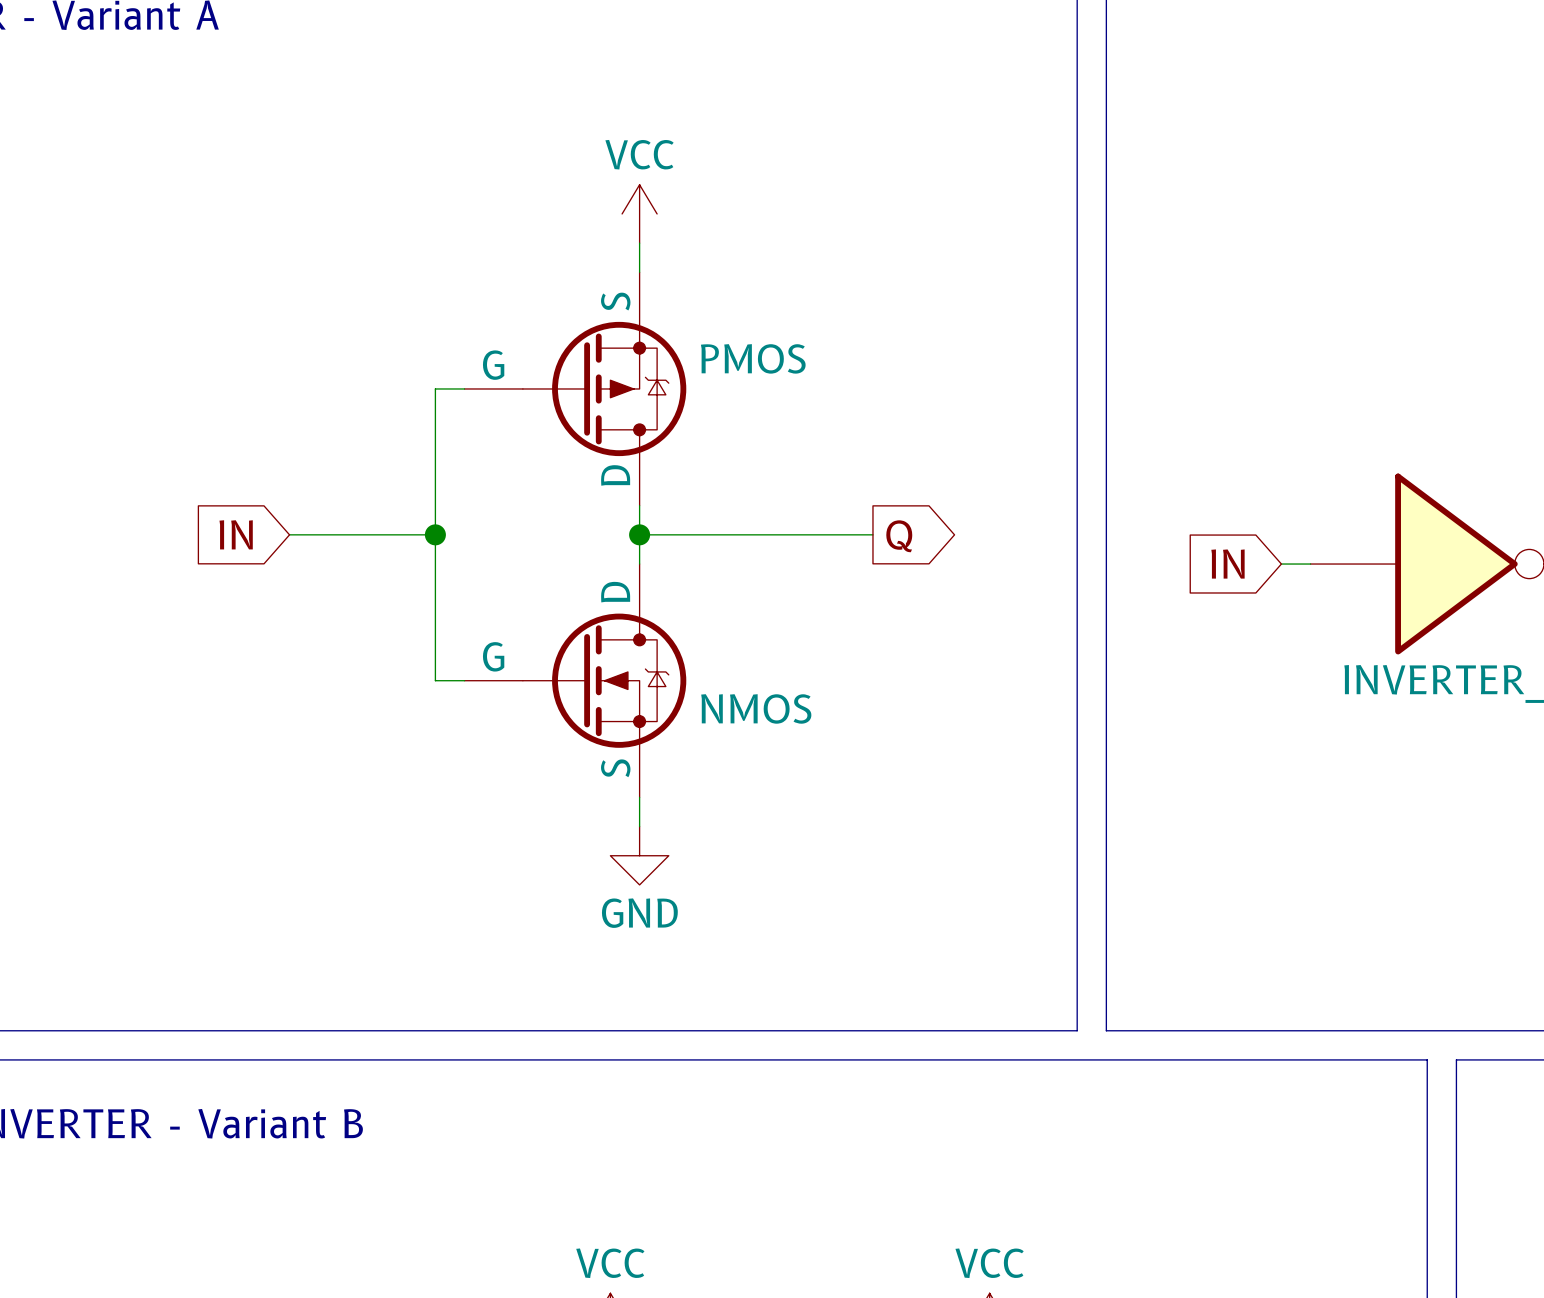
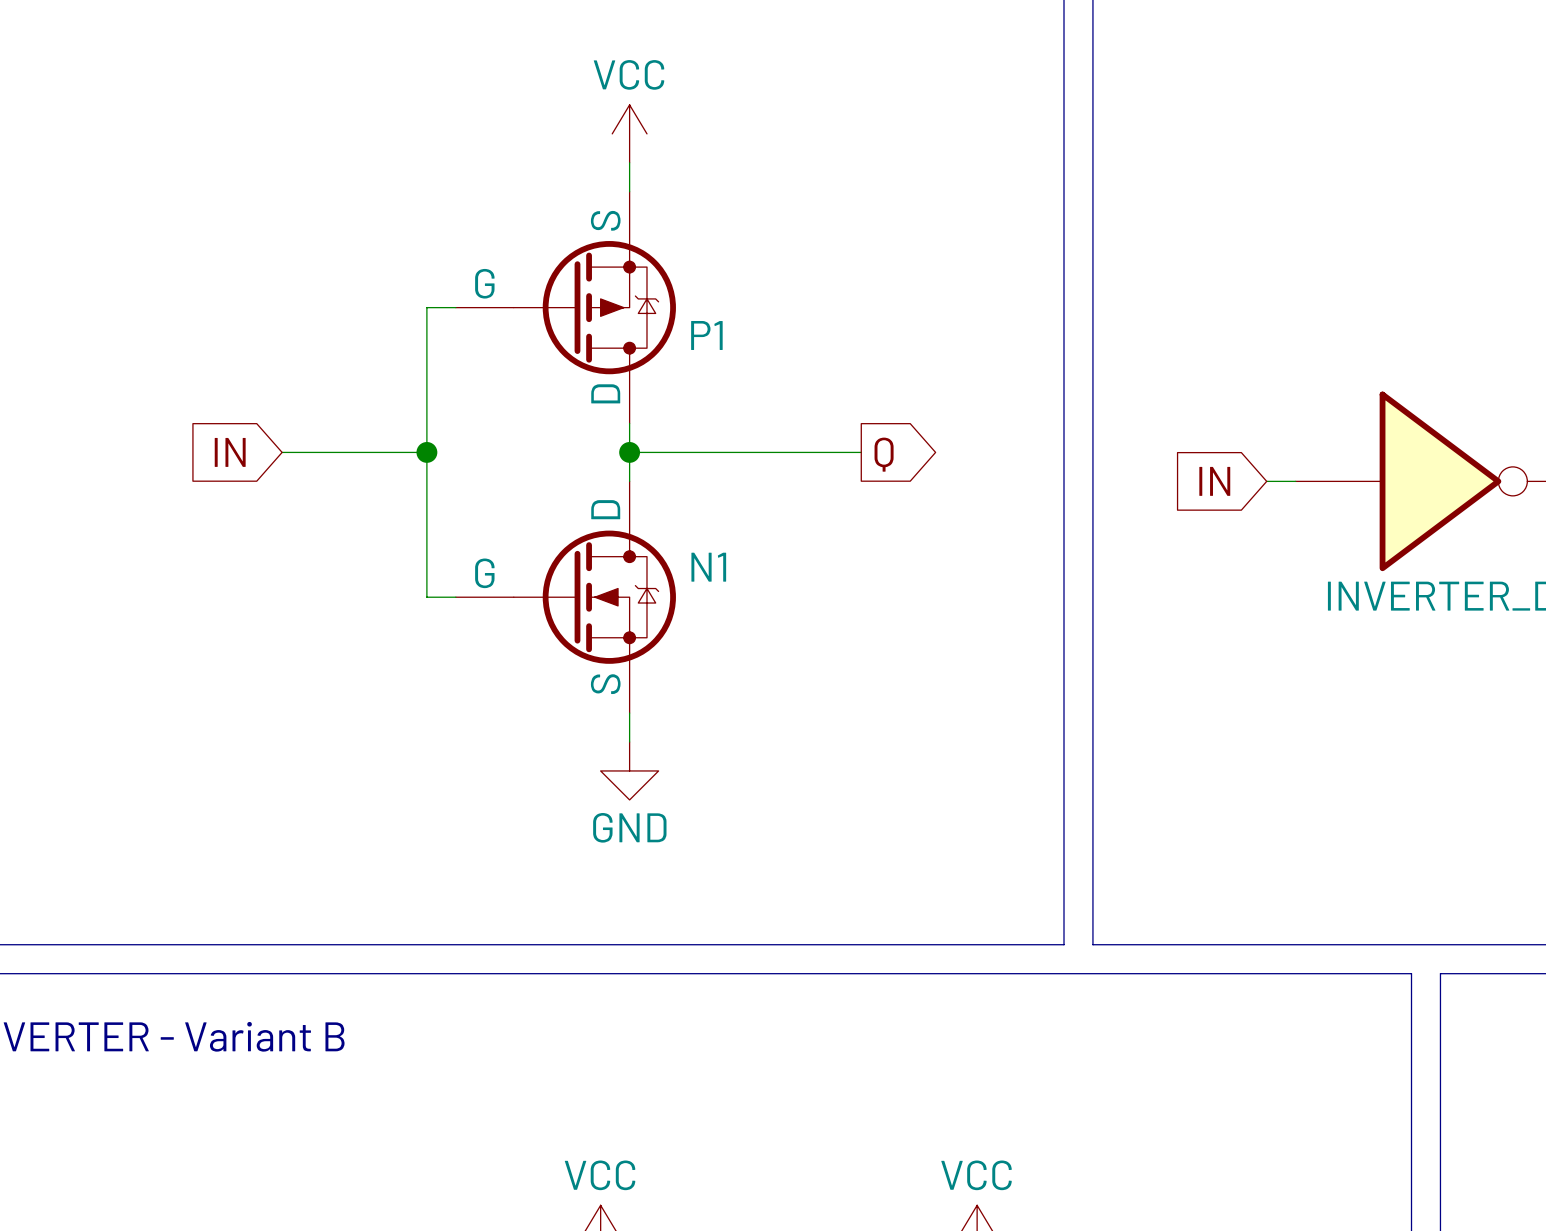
P1 value: PMOS (753, 358) -> none
P1 name: none -> P1 (706, 335)
N1 name: none -> N1 (708, 567)
N1 value: NMOS (756, 708) -> none

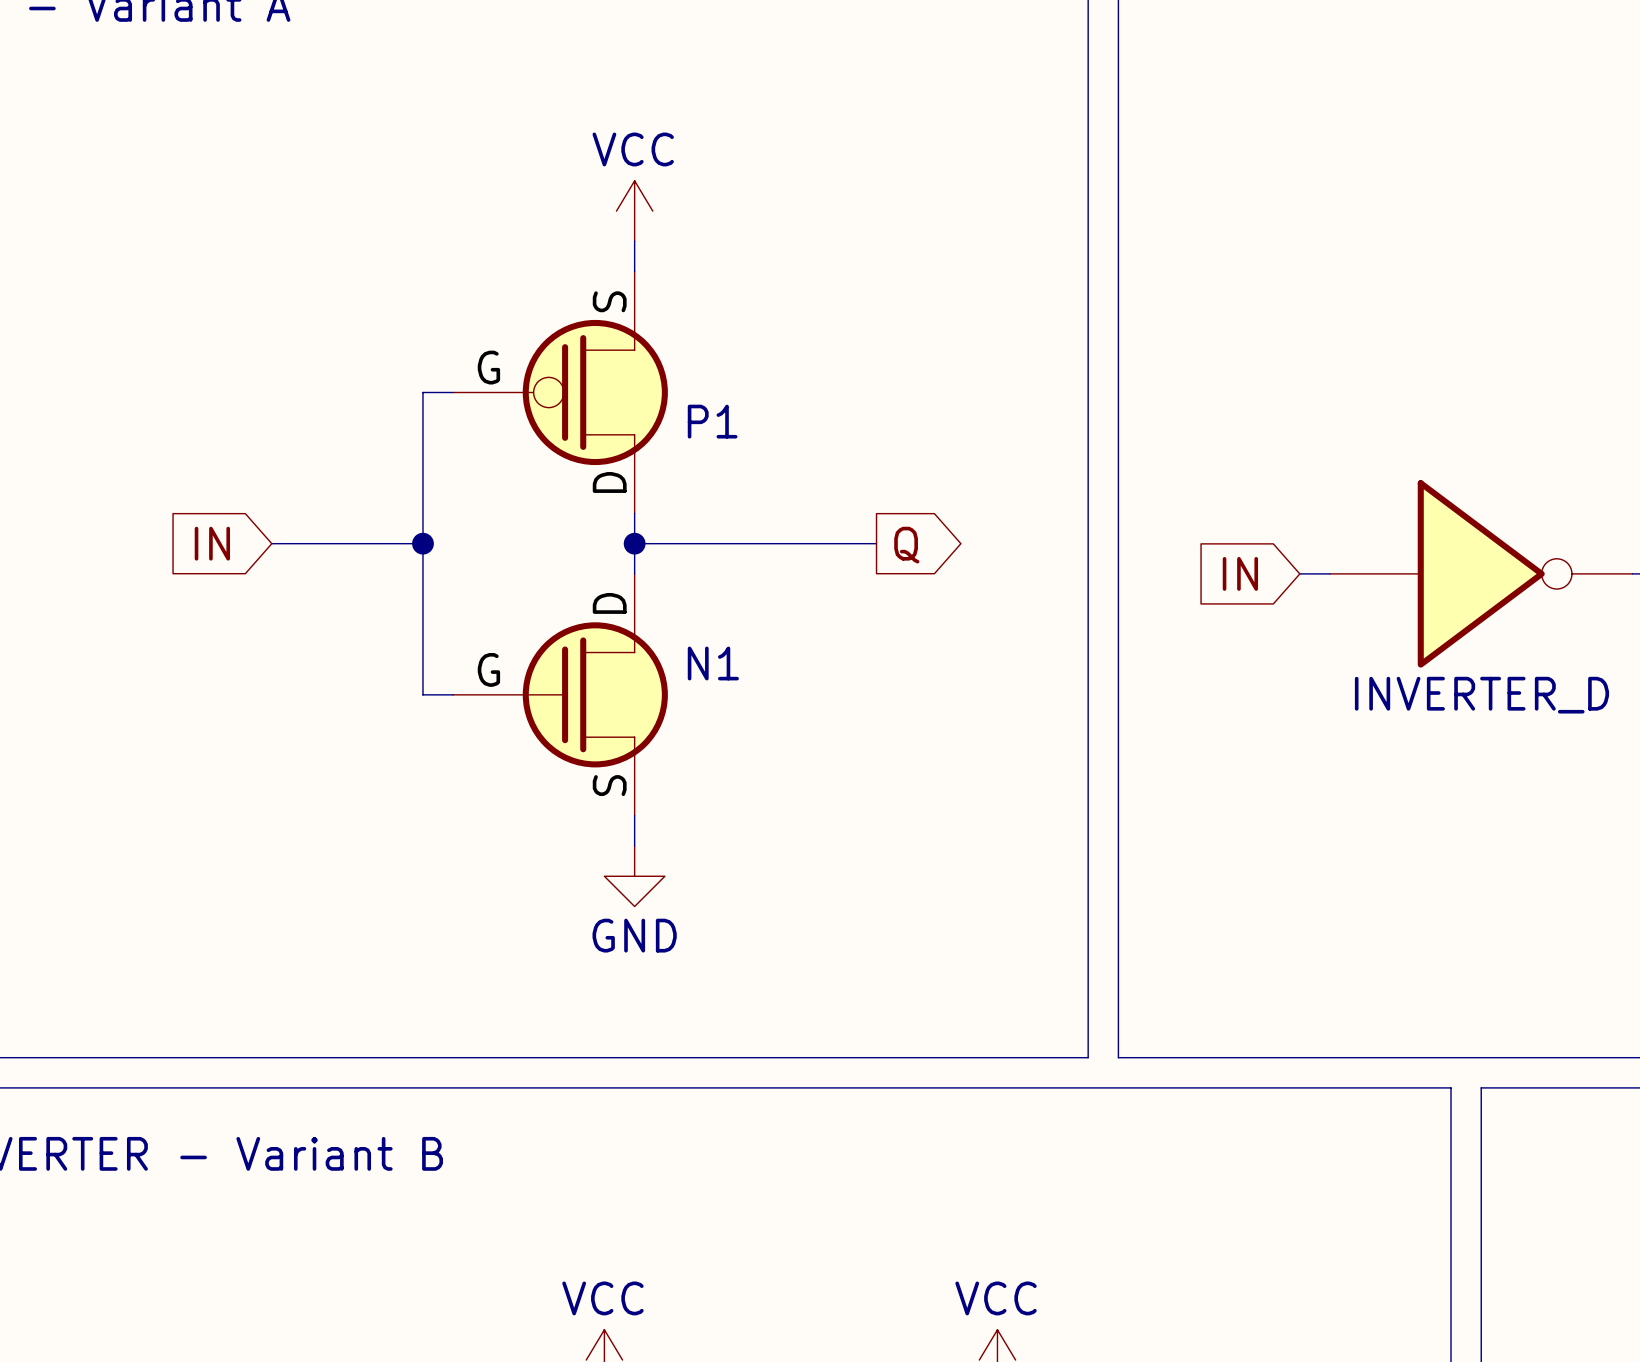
P1 symbol: [455, 191, 676, 424] -> [453, 271, 668, 514]
N1 symbol: [455, 481, 676, 714] -> [453, 573, 668, 816]

